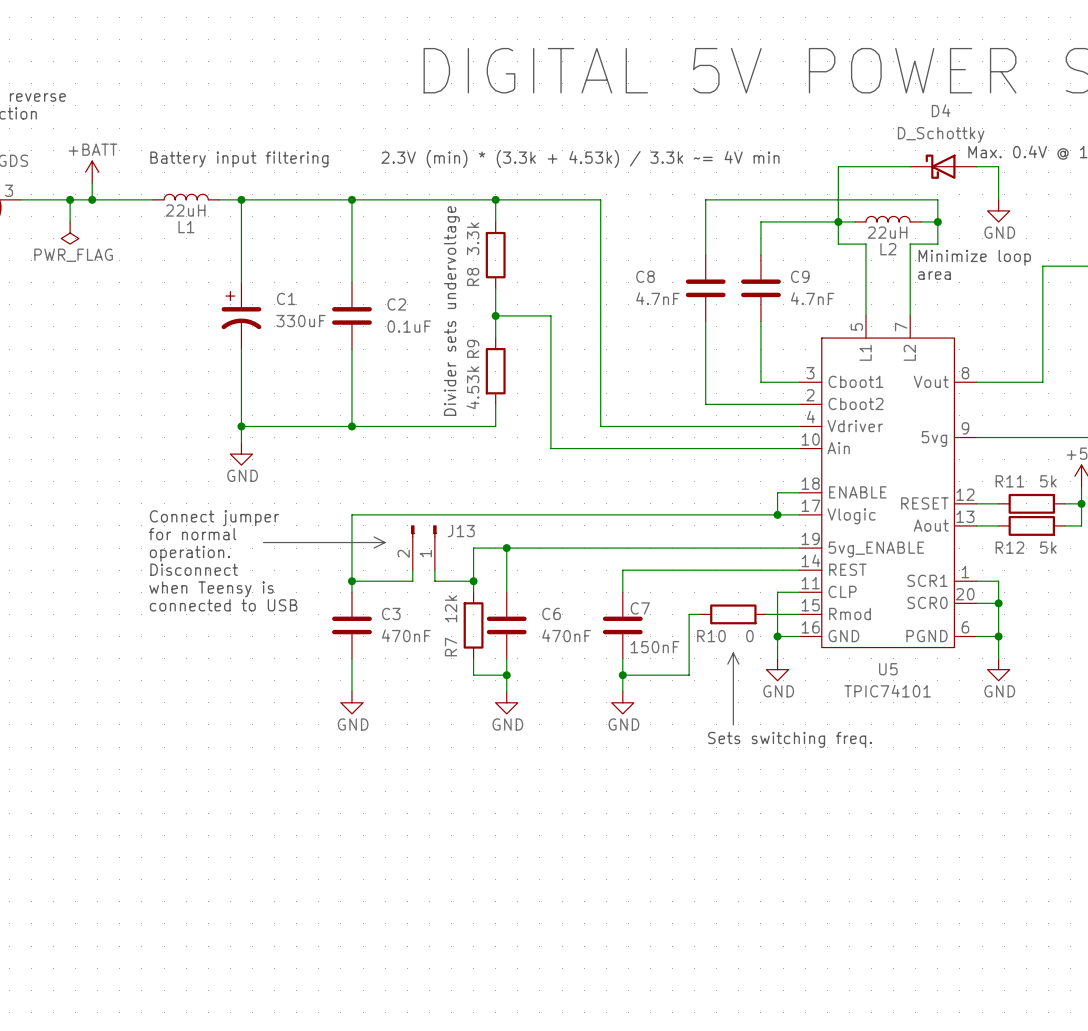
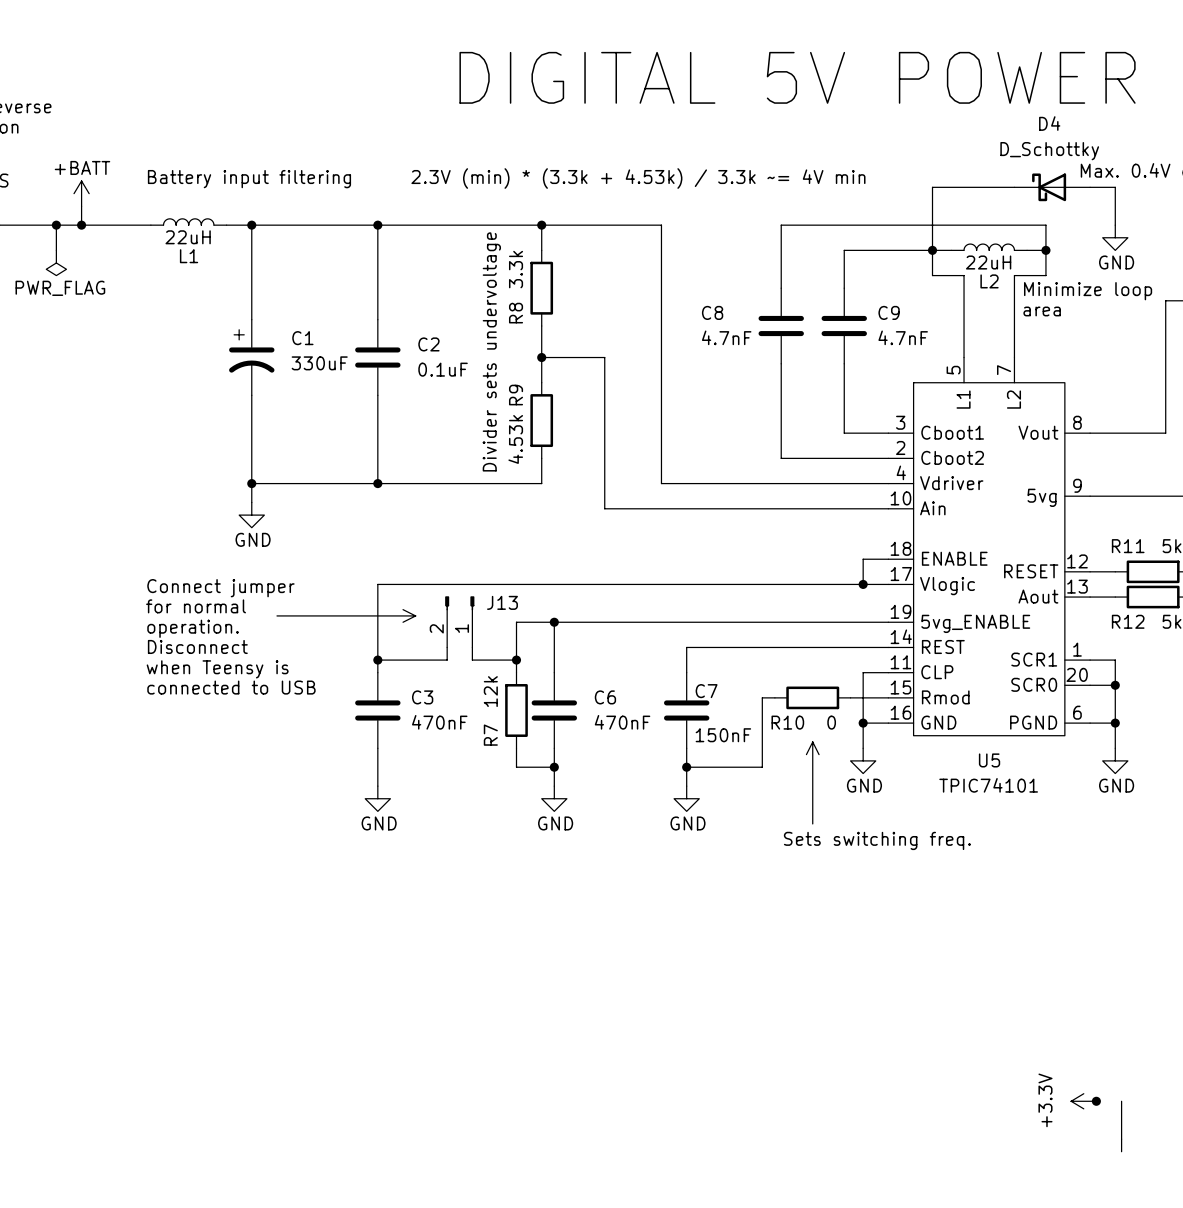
power symbol: none -> +3.3V (1083, 1101)
junction: none -> (1096, 1101)
wire: none -> (1121, 1101) (1121, 1151)

